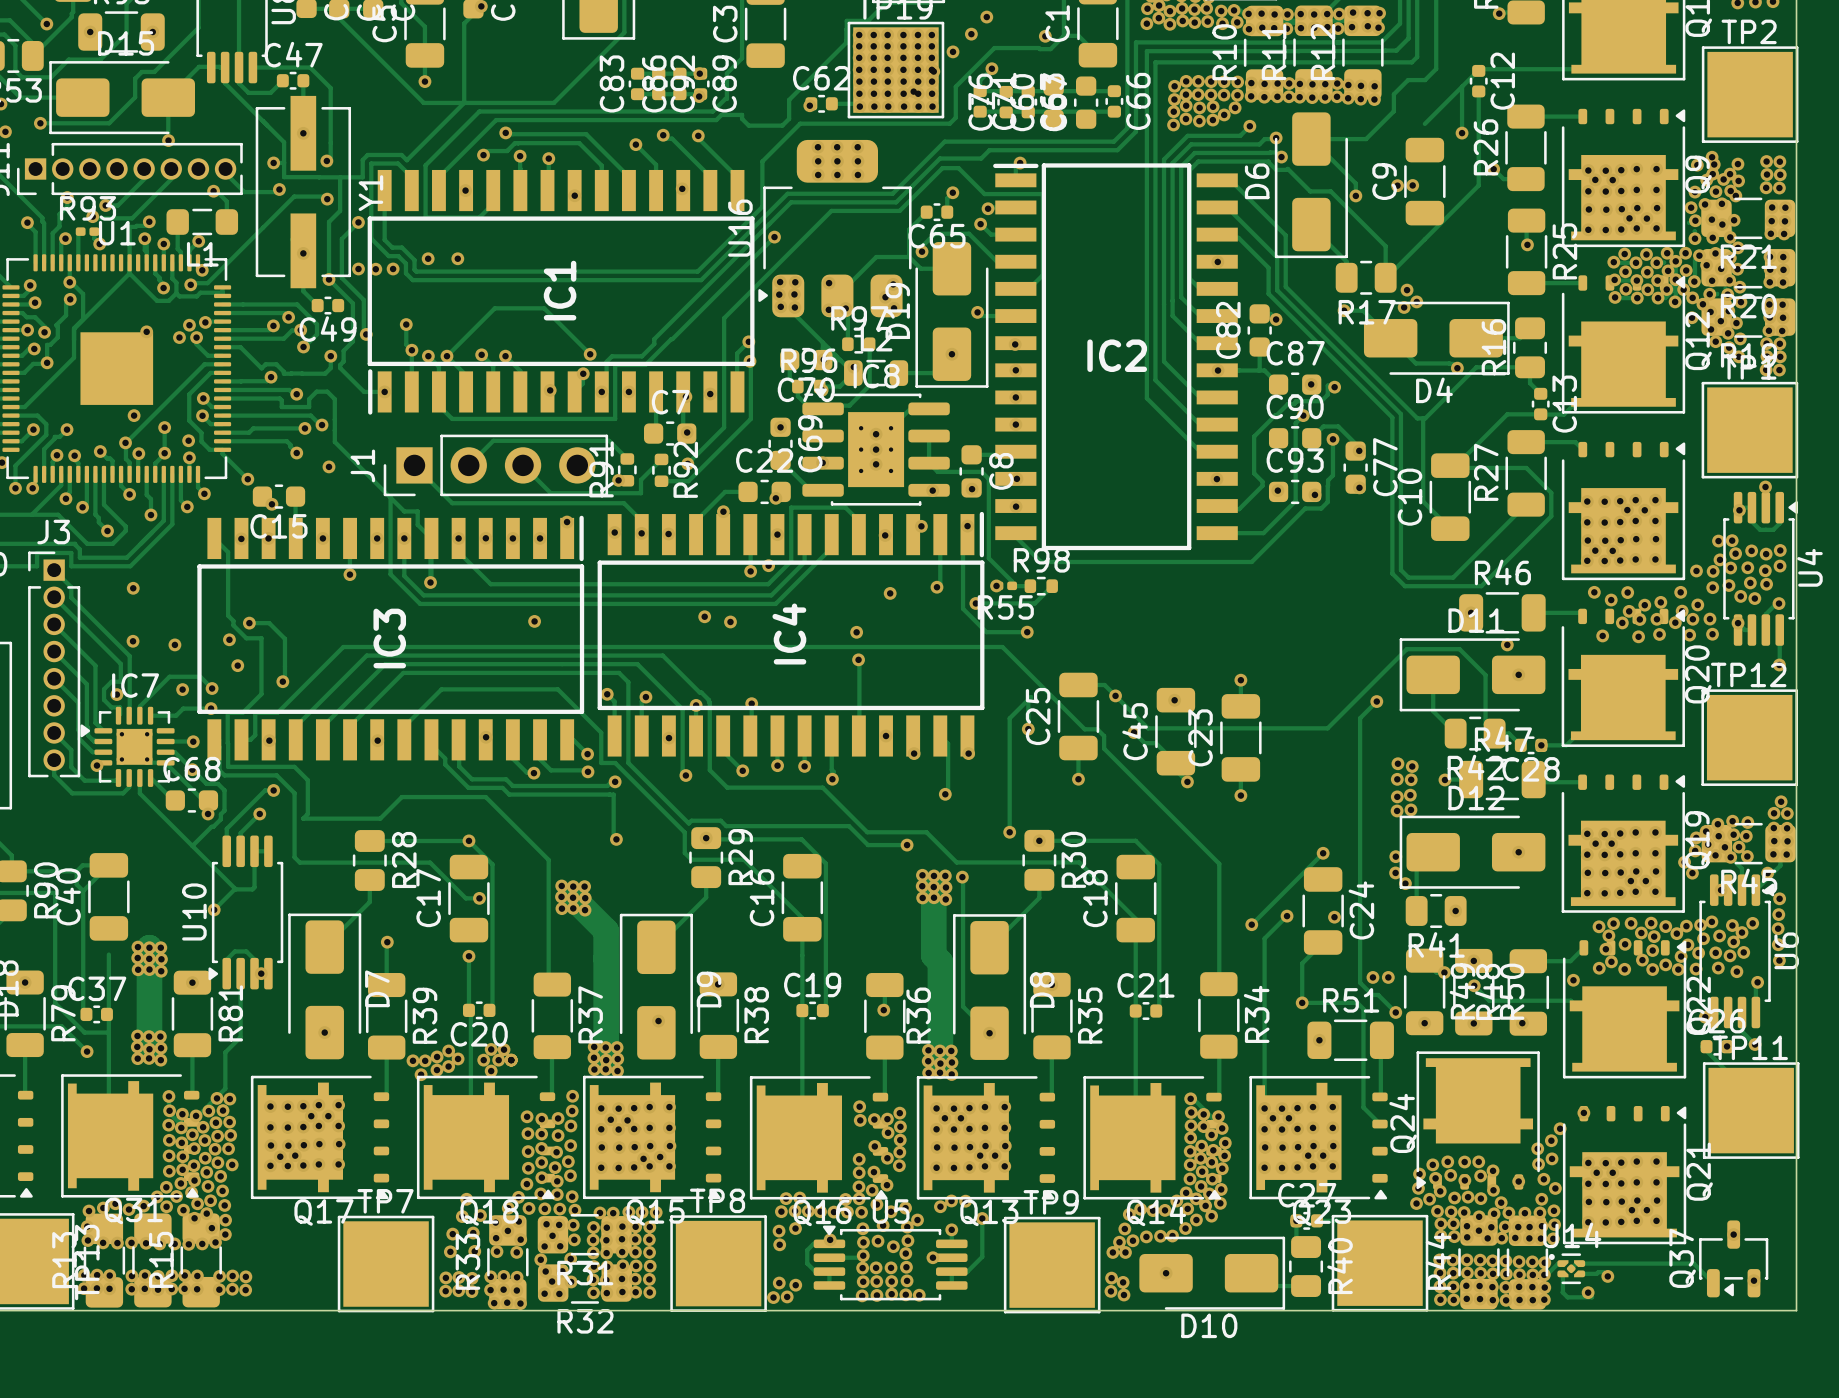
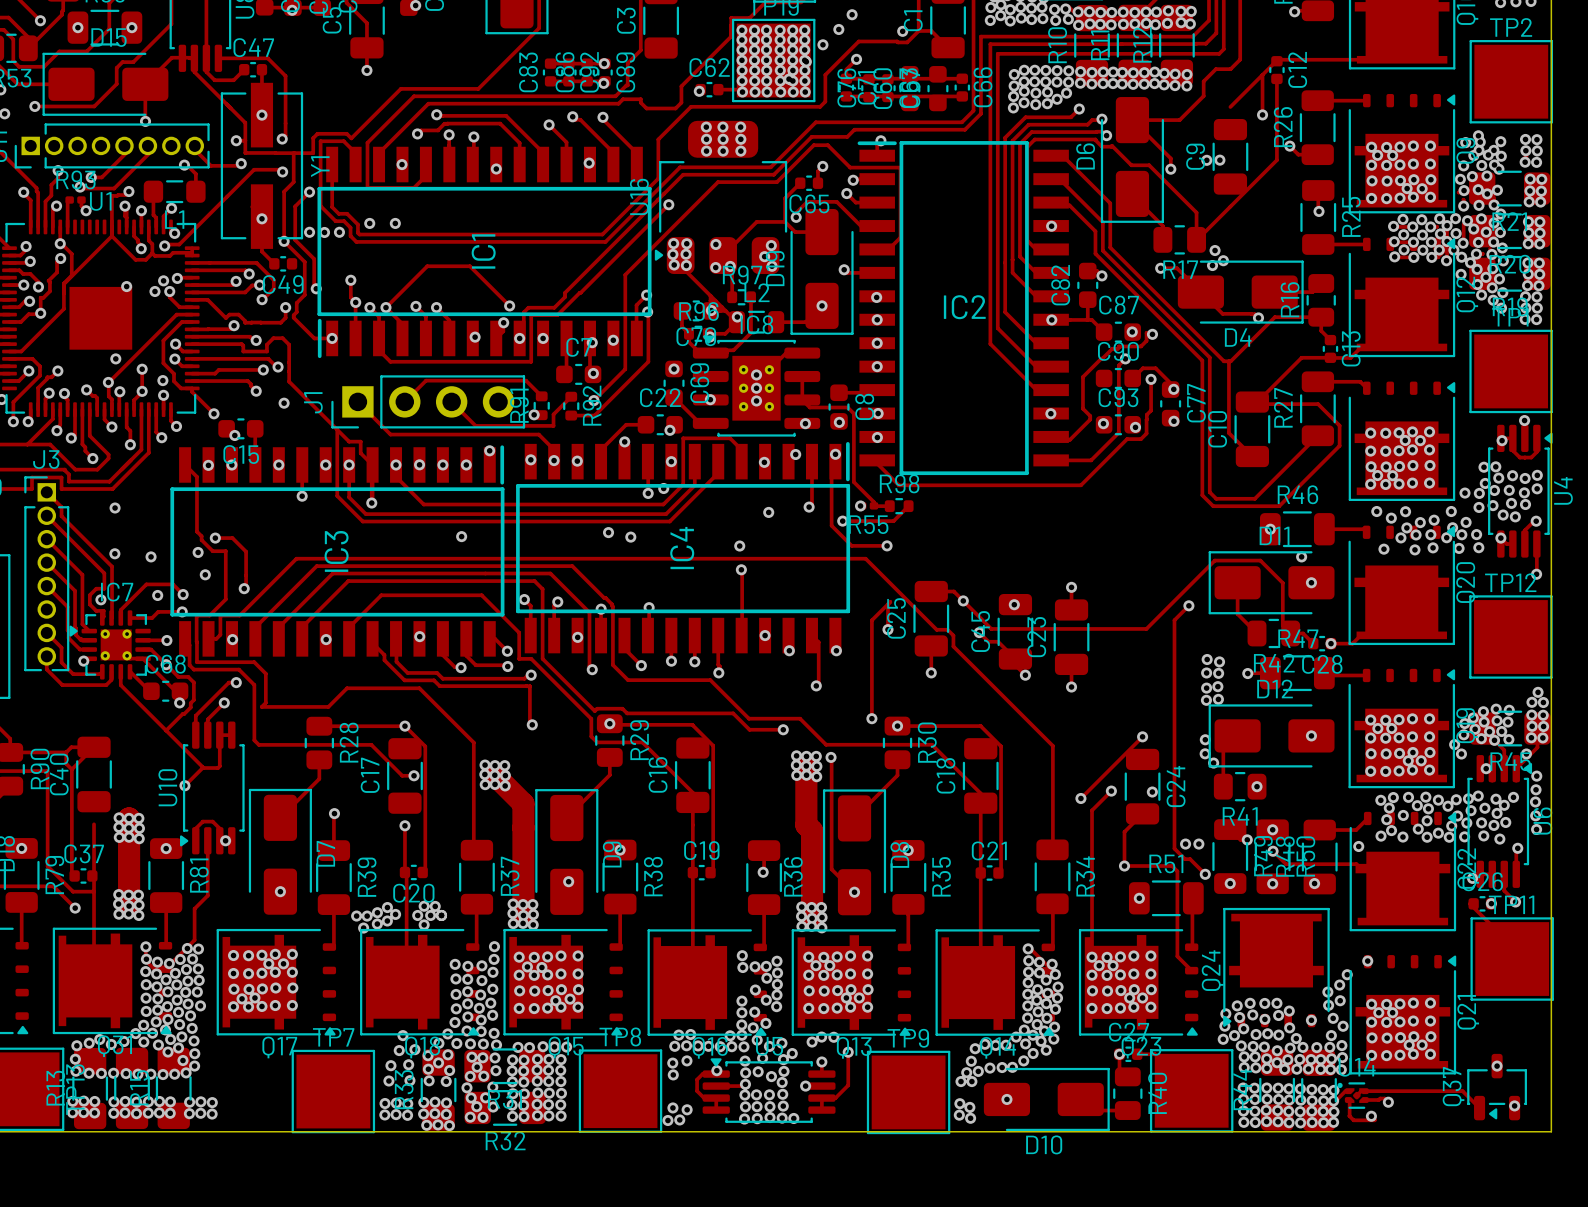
track: (478, 8) (464, 23) (464, 102) (423, 102) (339, 18) (339, 11) -> none
via: none -> (292, 10)

